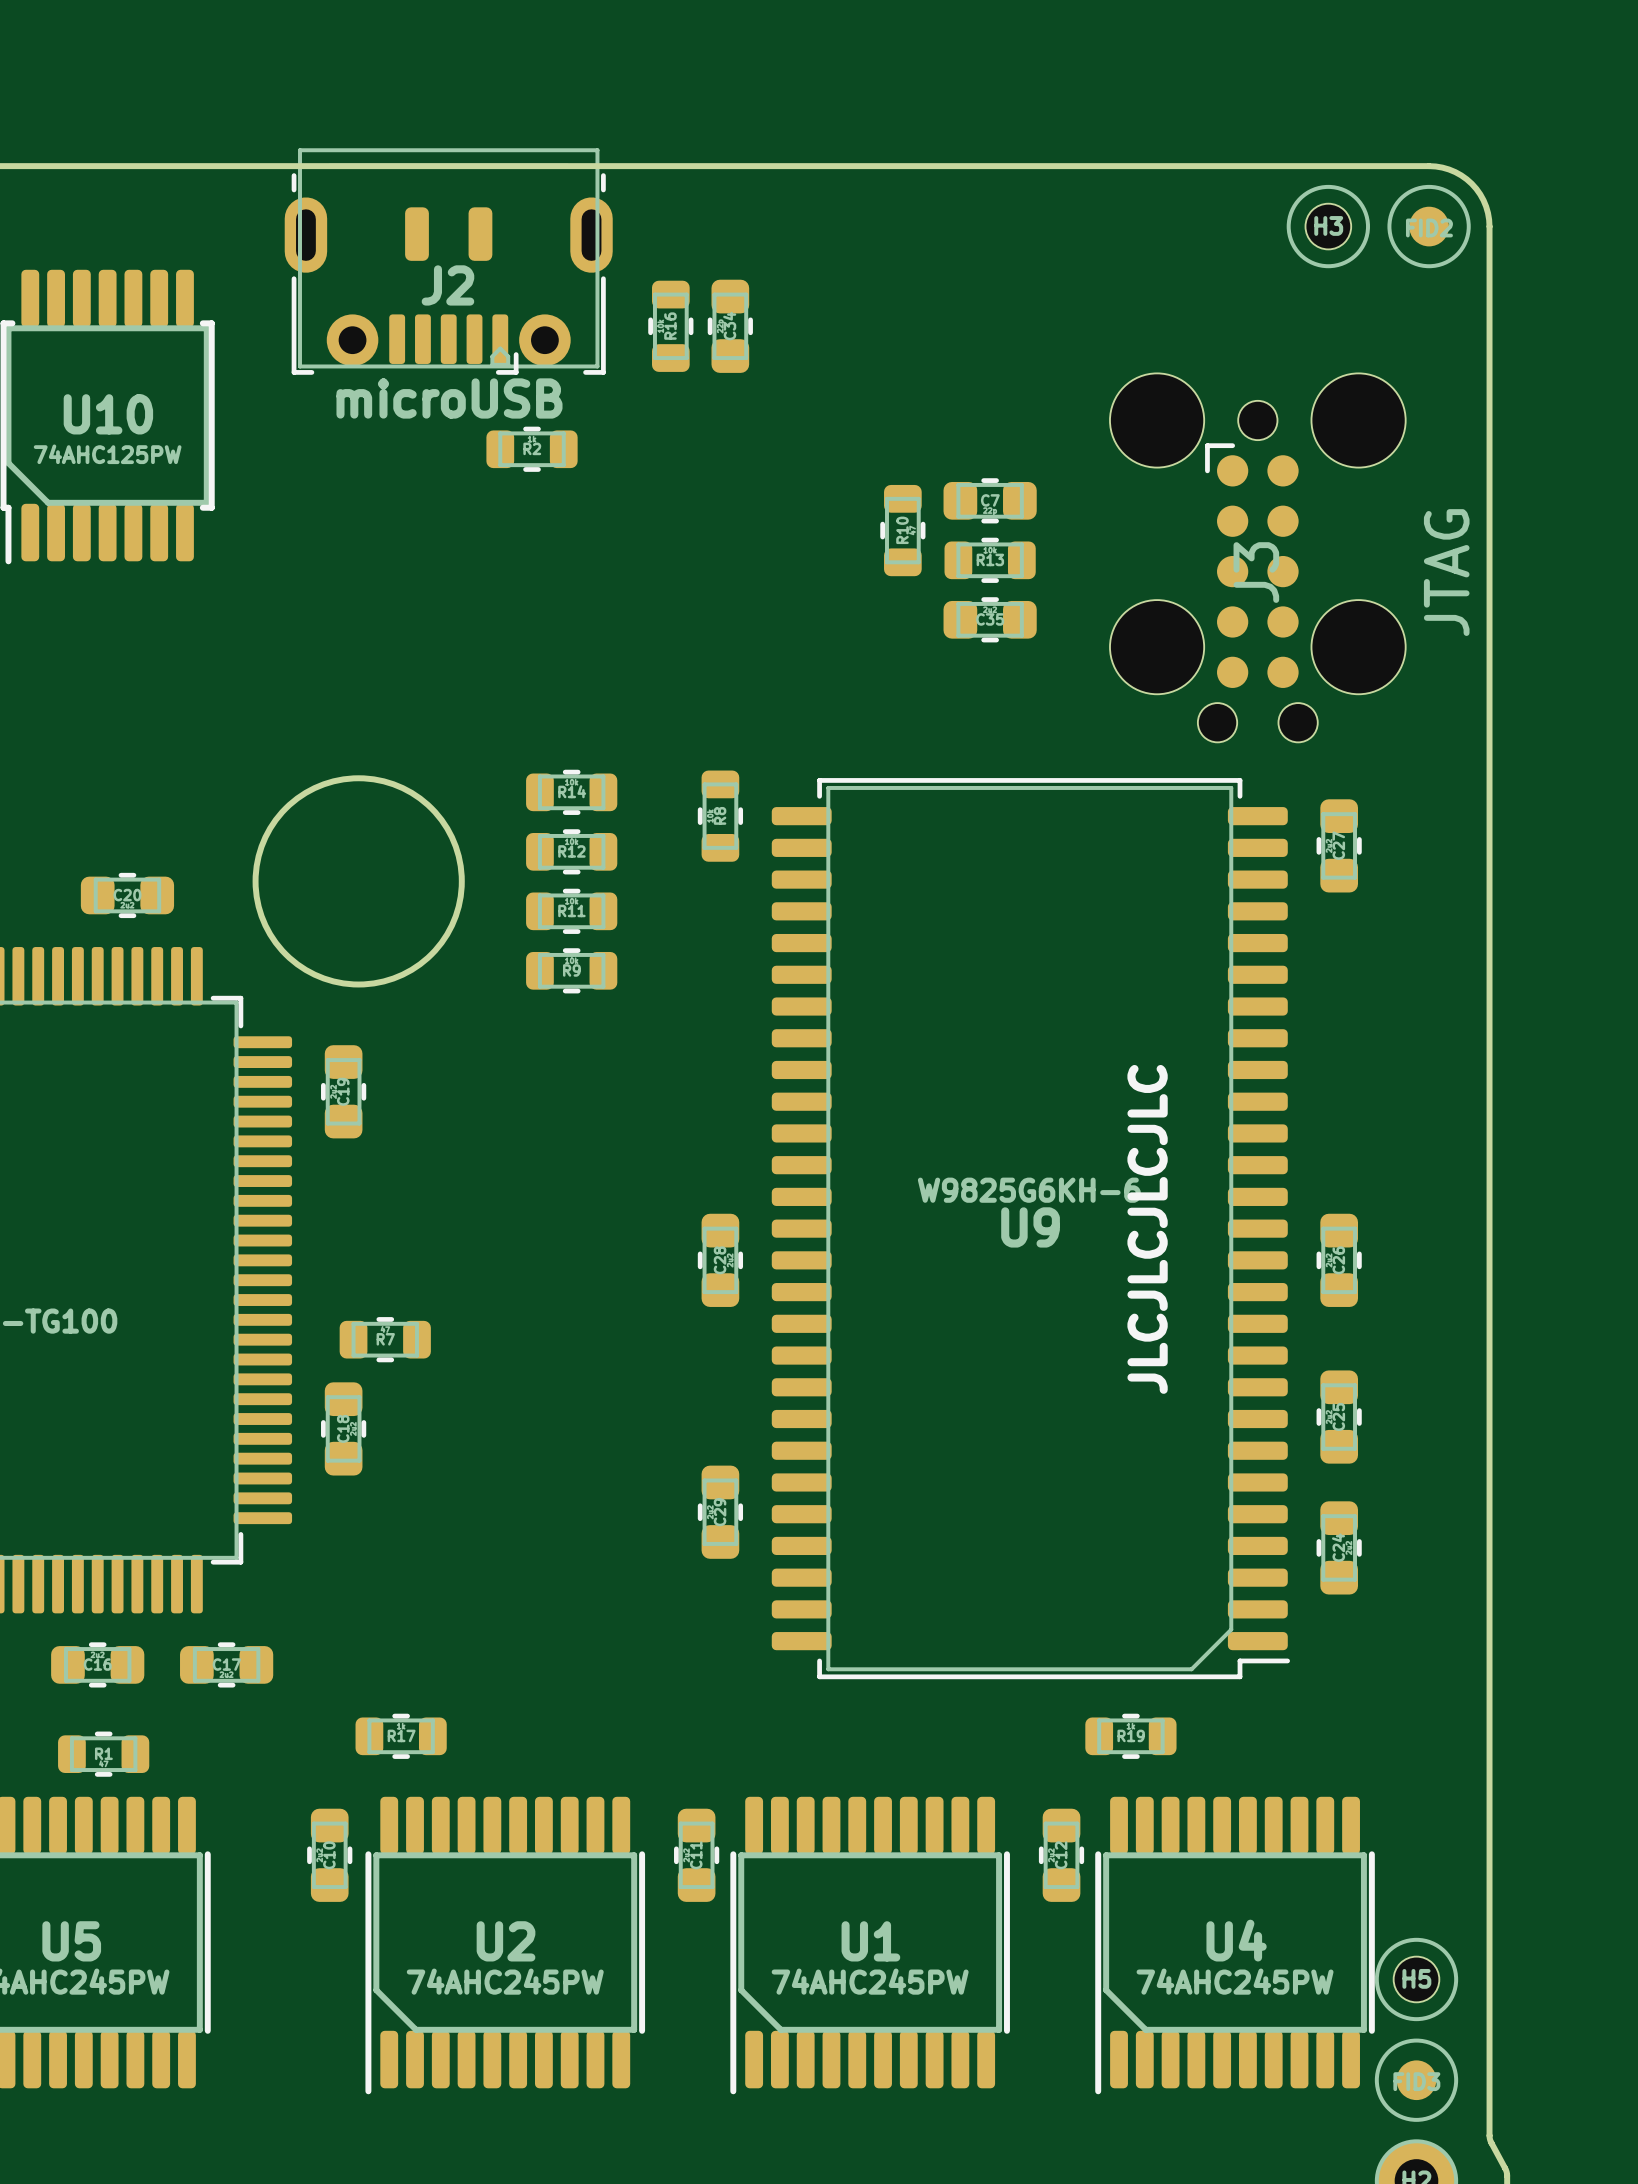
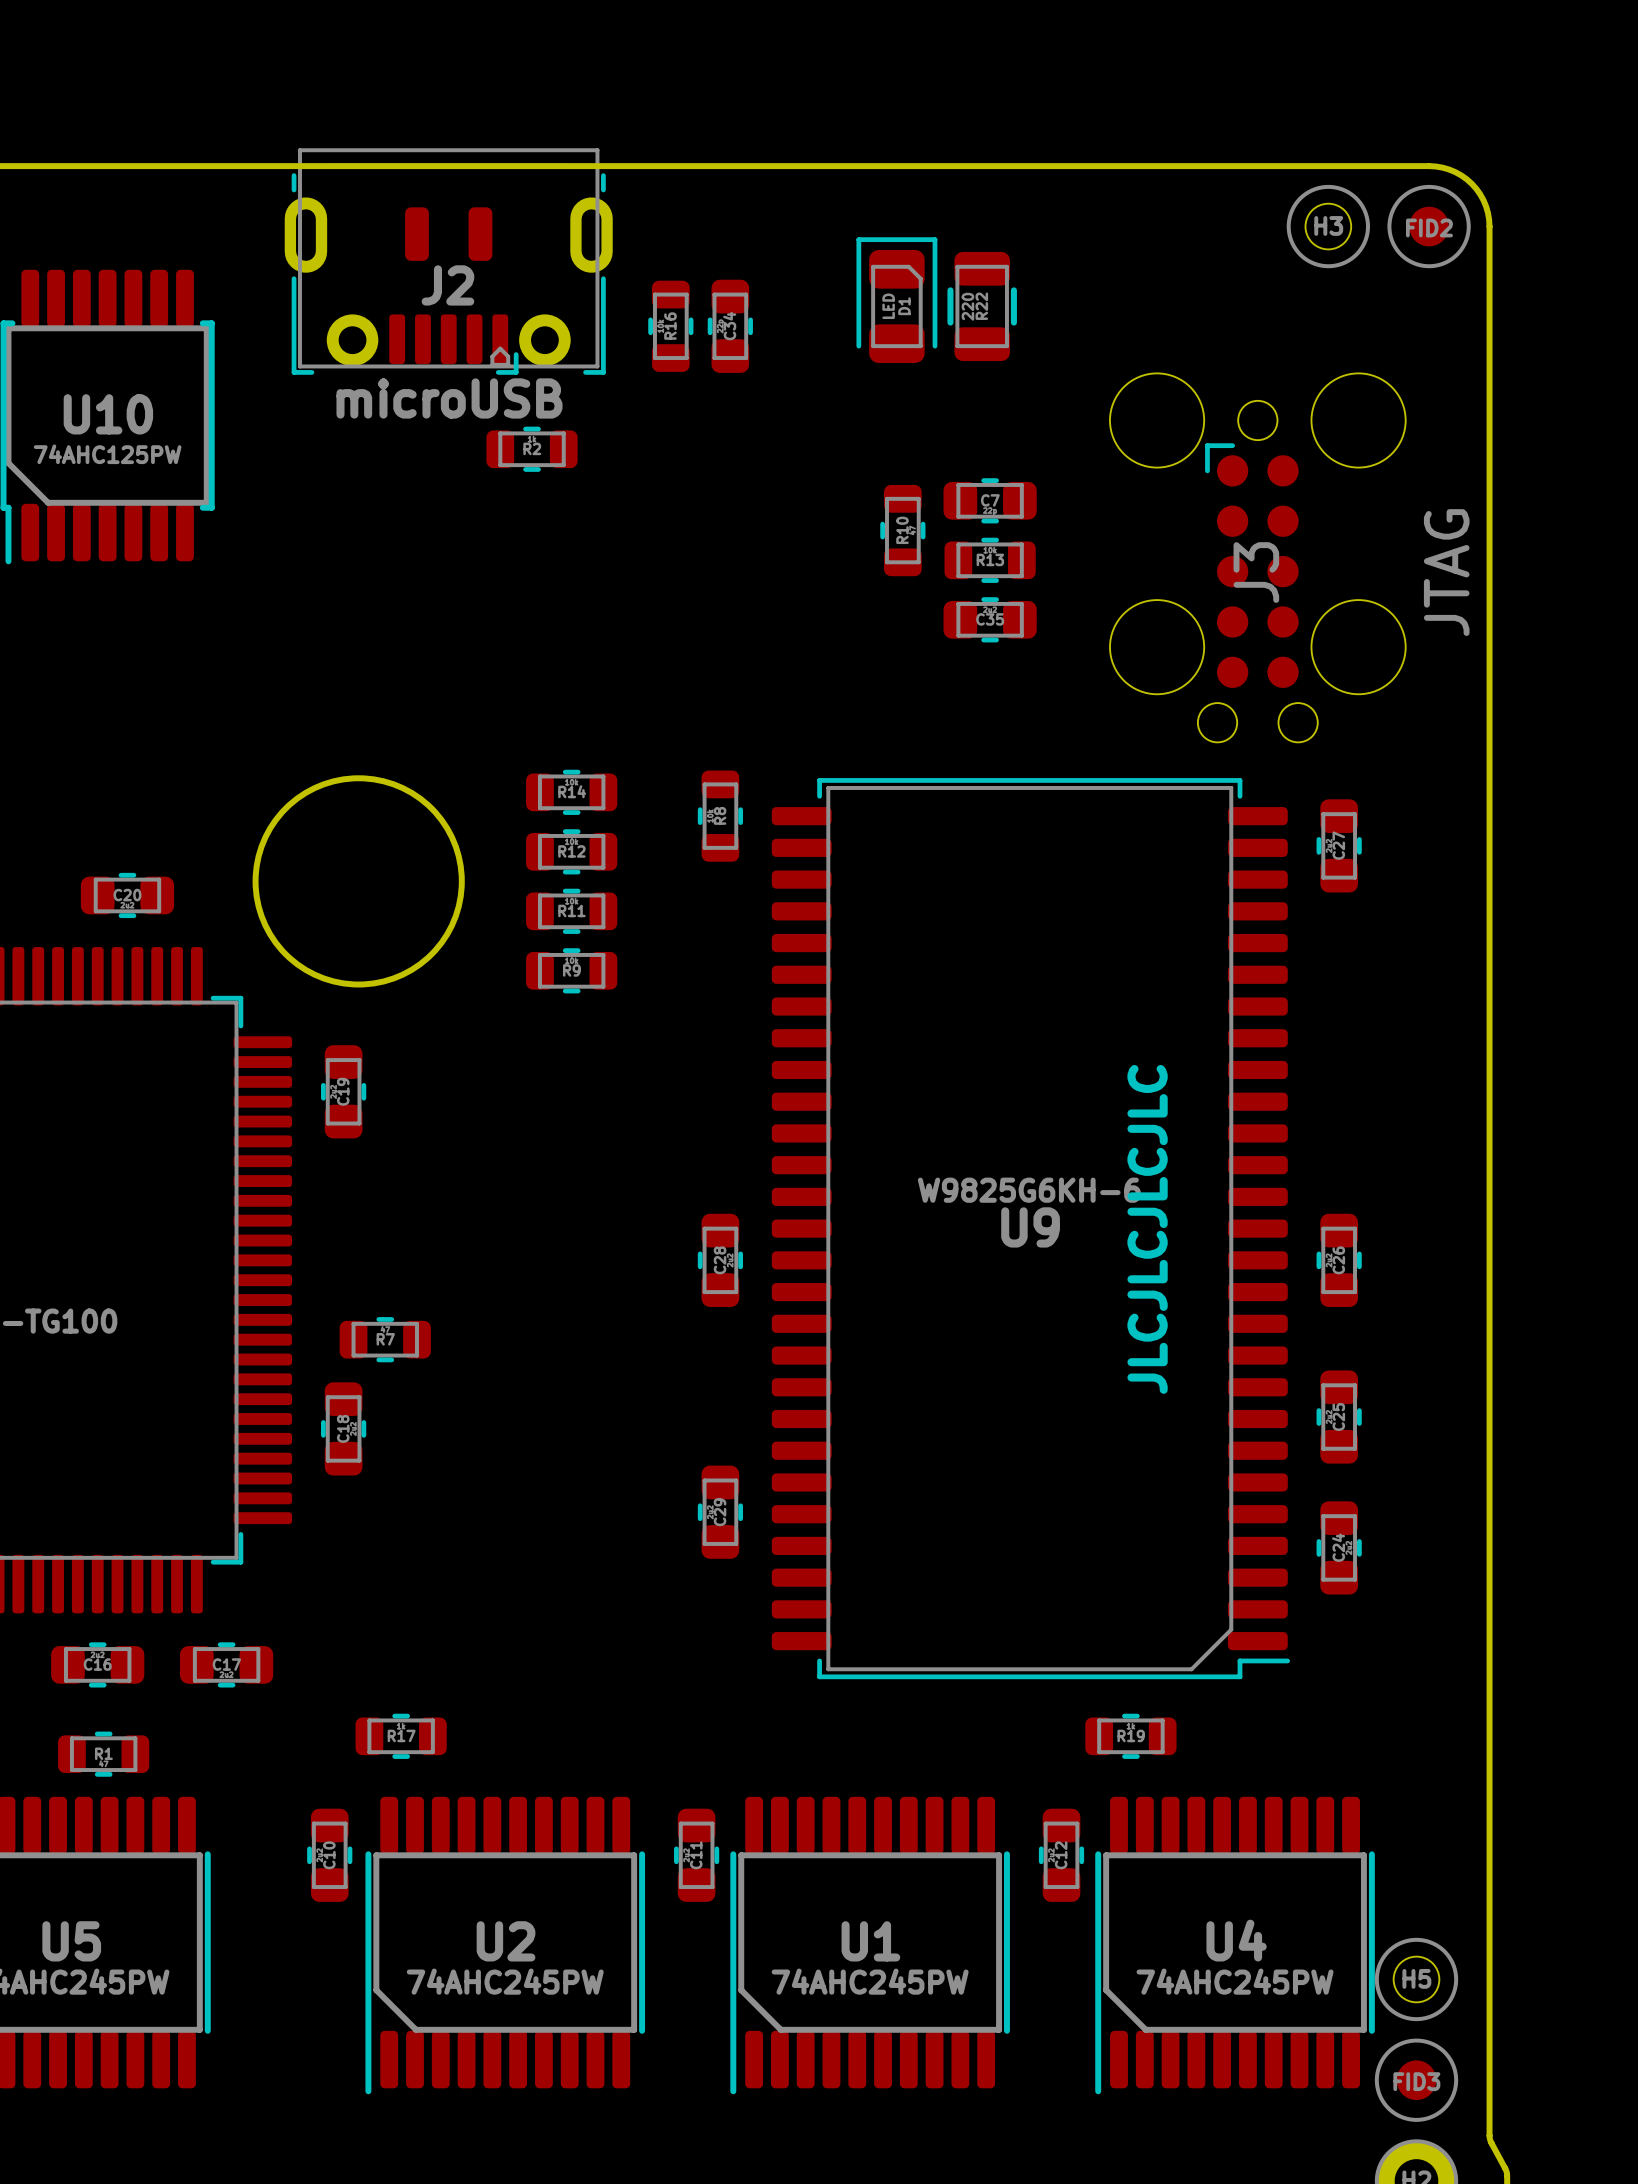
D1: none -> LED (896, 300)
R22: none -> 220 (982, 306)

